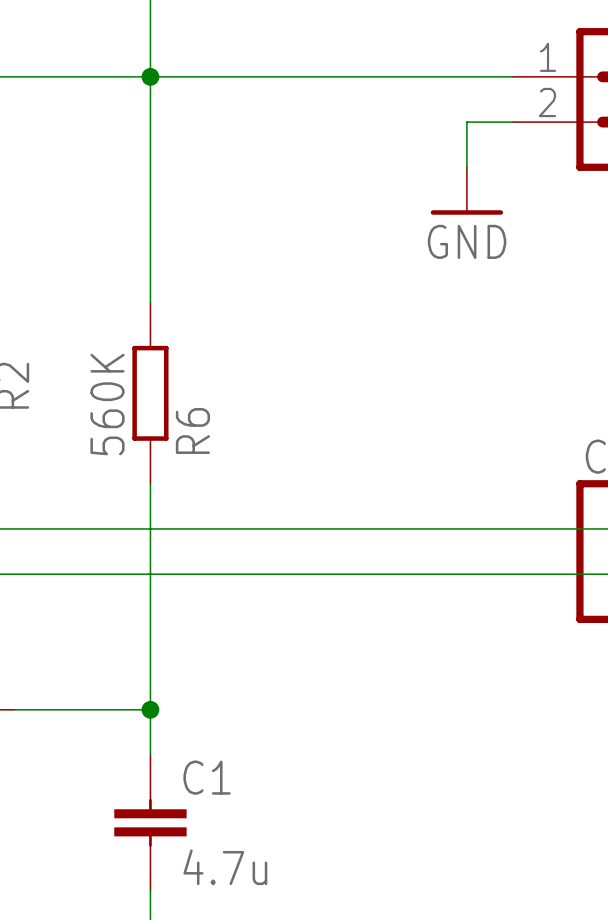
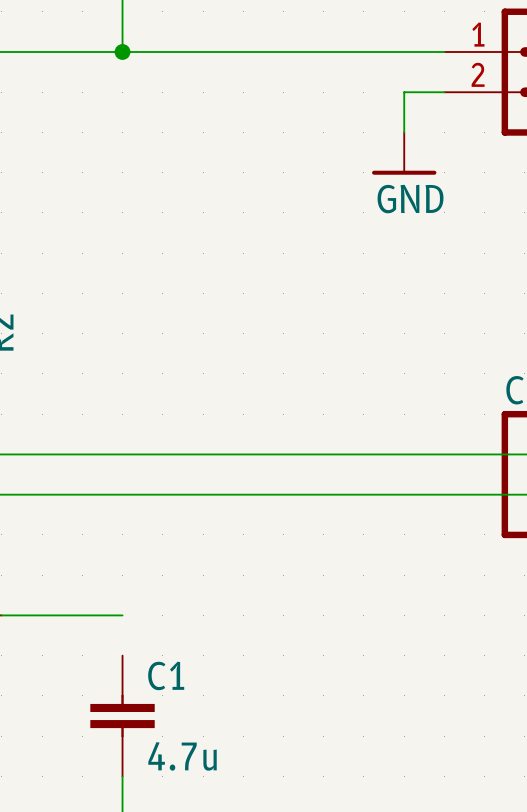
wire: (150, 76) (150, 302) -> none
R6: 560K (150, 393) -> none
wire: (150, 483) (150, 755) -> none
junction: (150, 709) -> none

